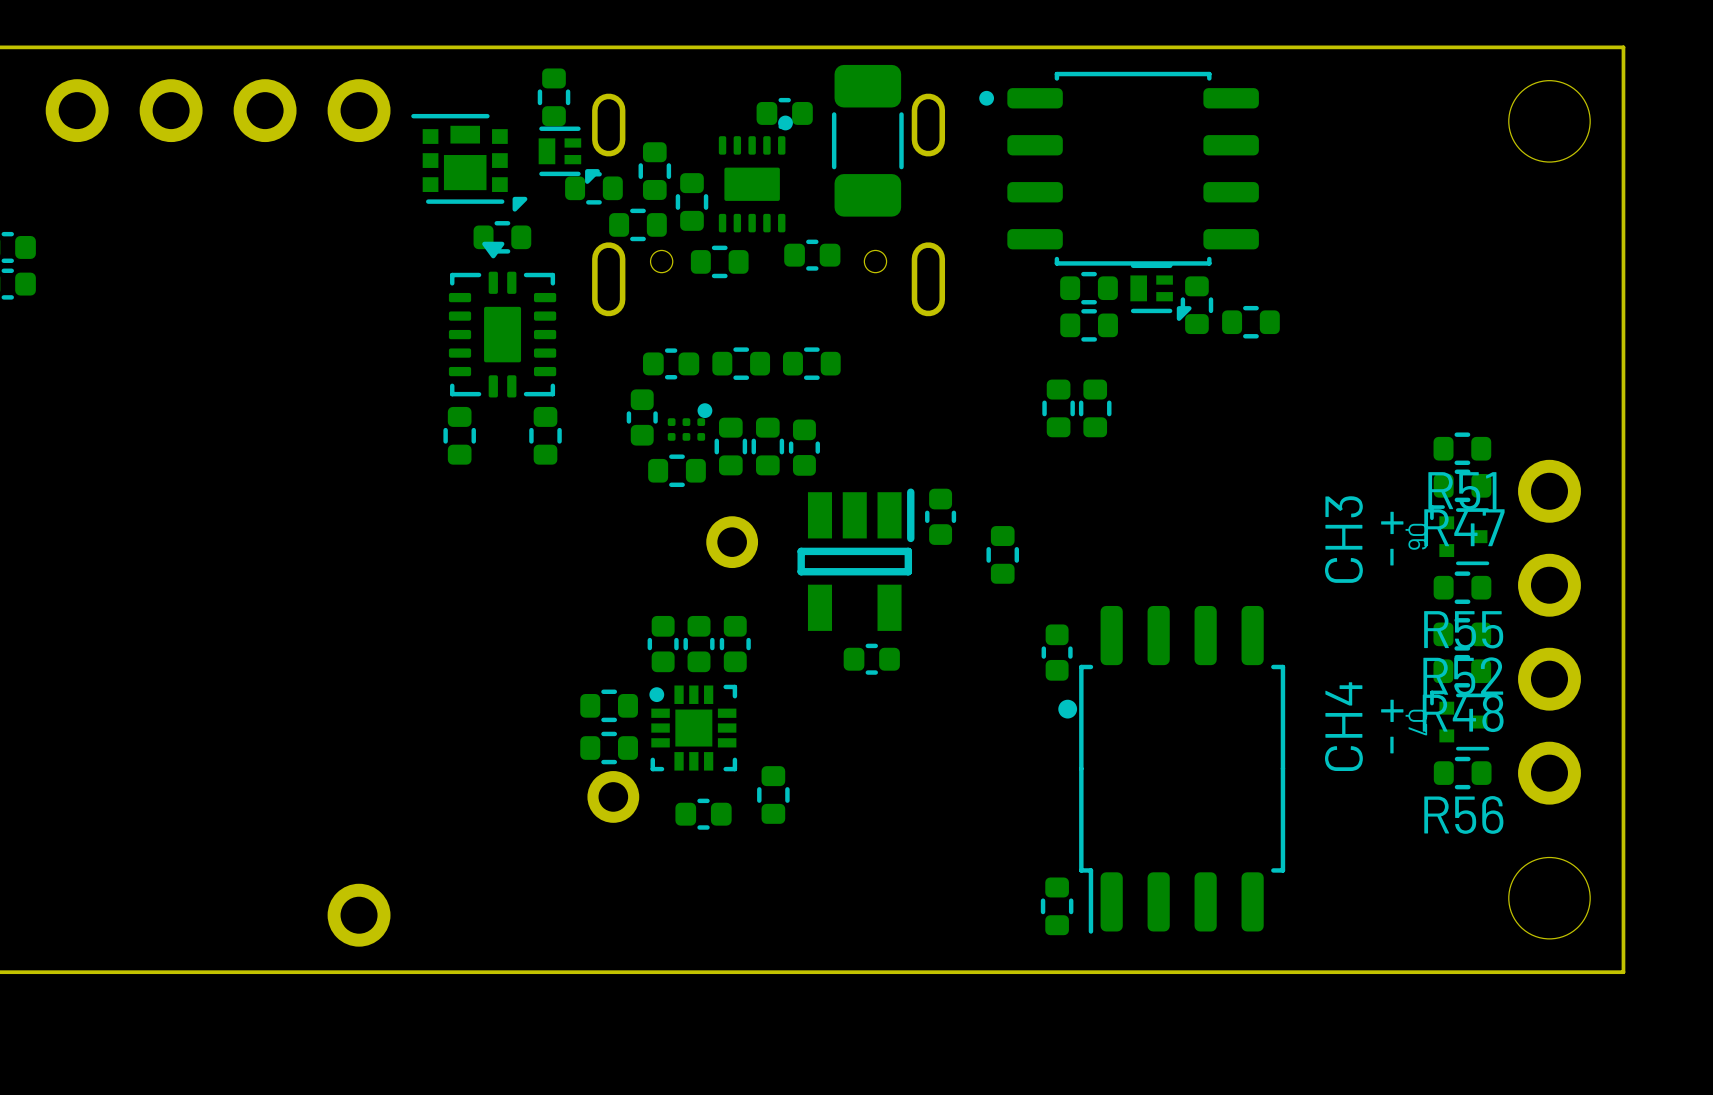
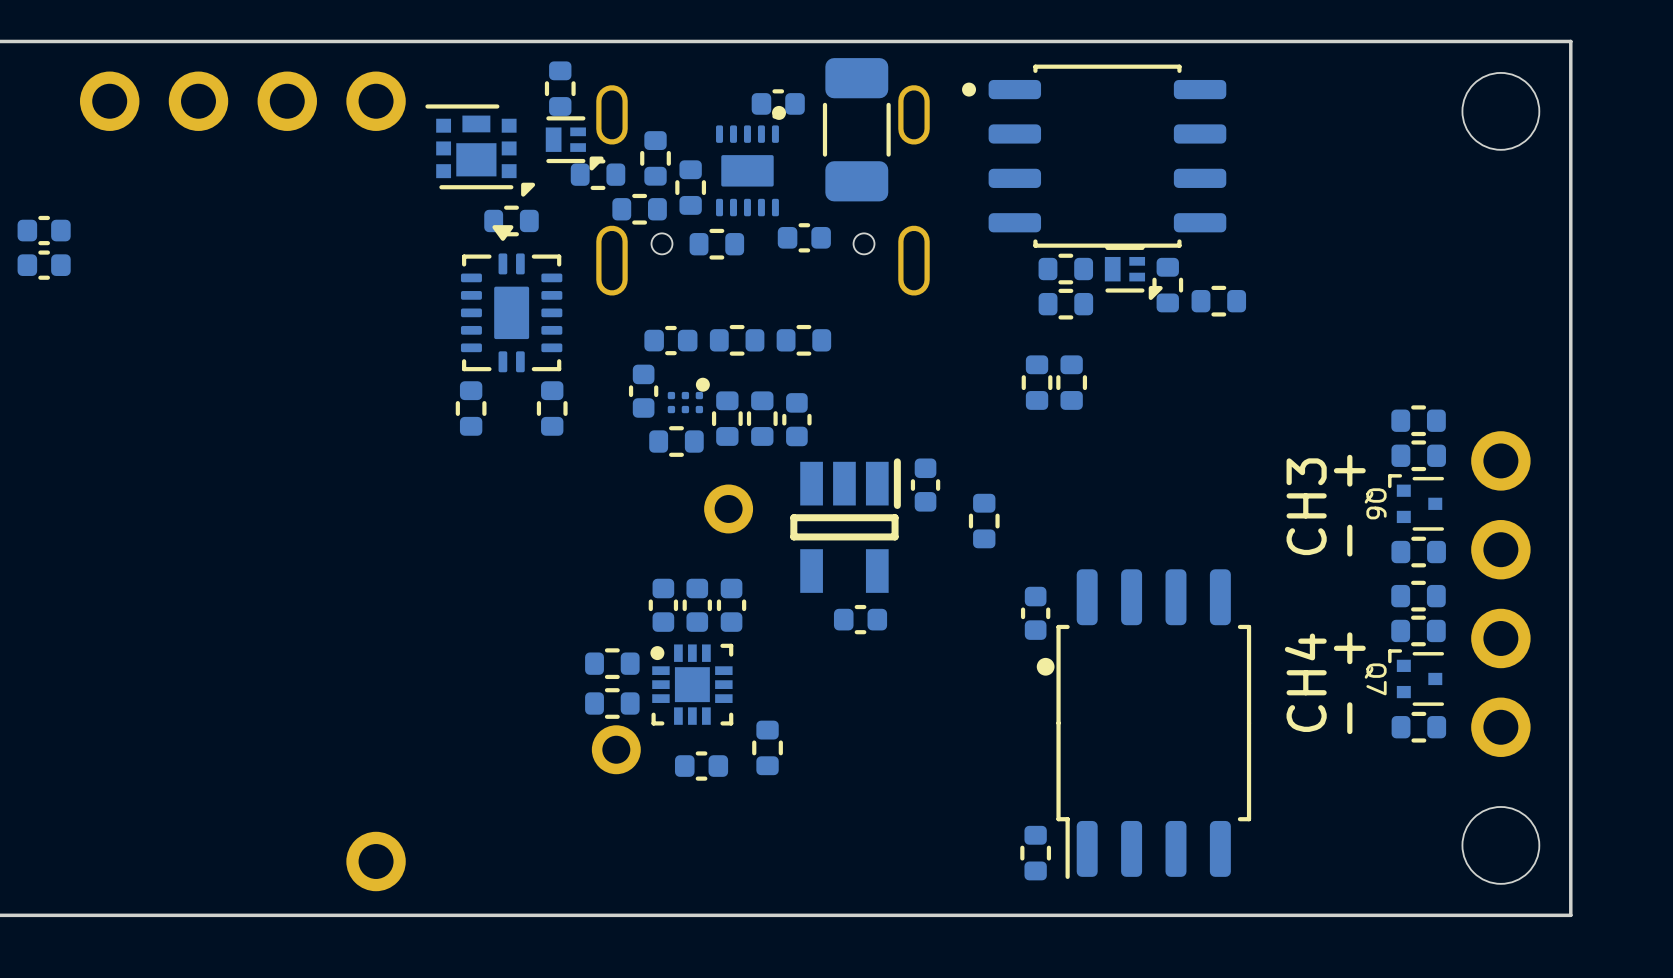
R51 name: R51 (1462, 490) -> none
R47 name: R47 (1464, 527) -> none
R55 name: R55 (1463, 629) -> none
R52 name: R52 (1463, 676) -> none
R48 name: R48 (1463, 713) -> none
R56 name: R56 (1463, 814) -> none

